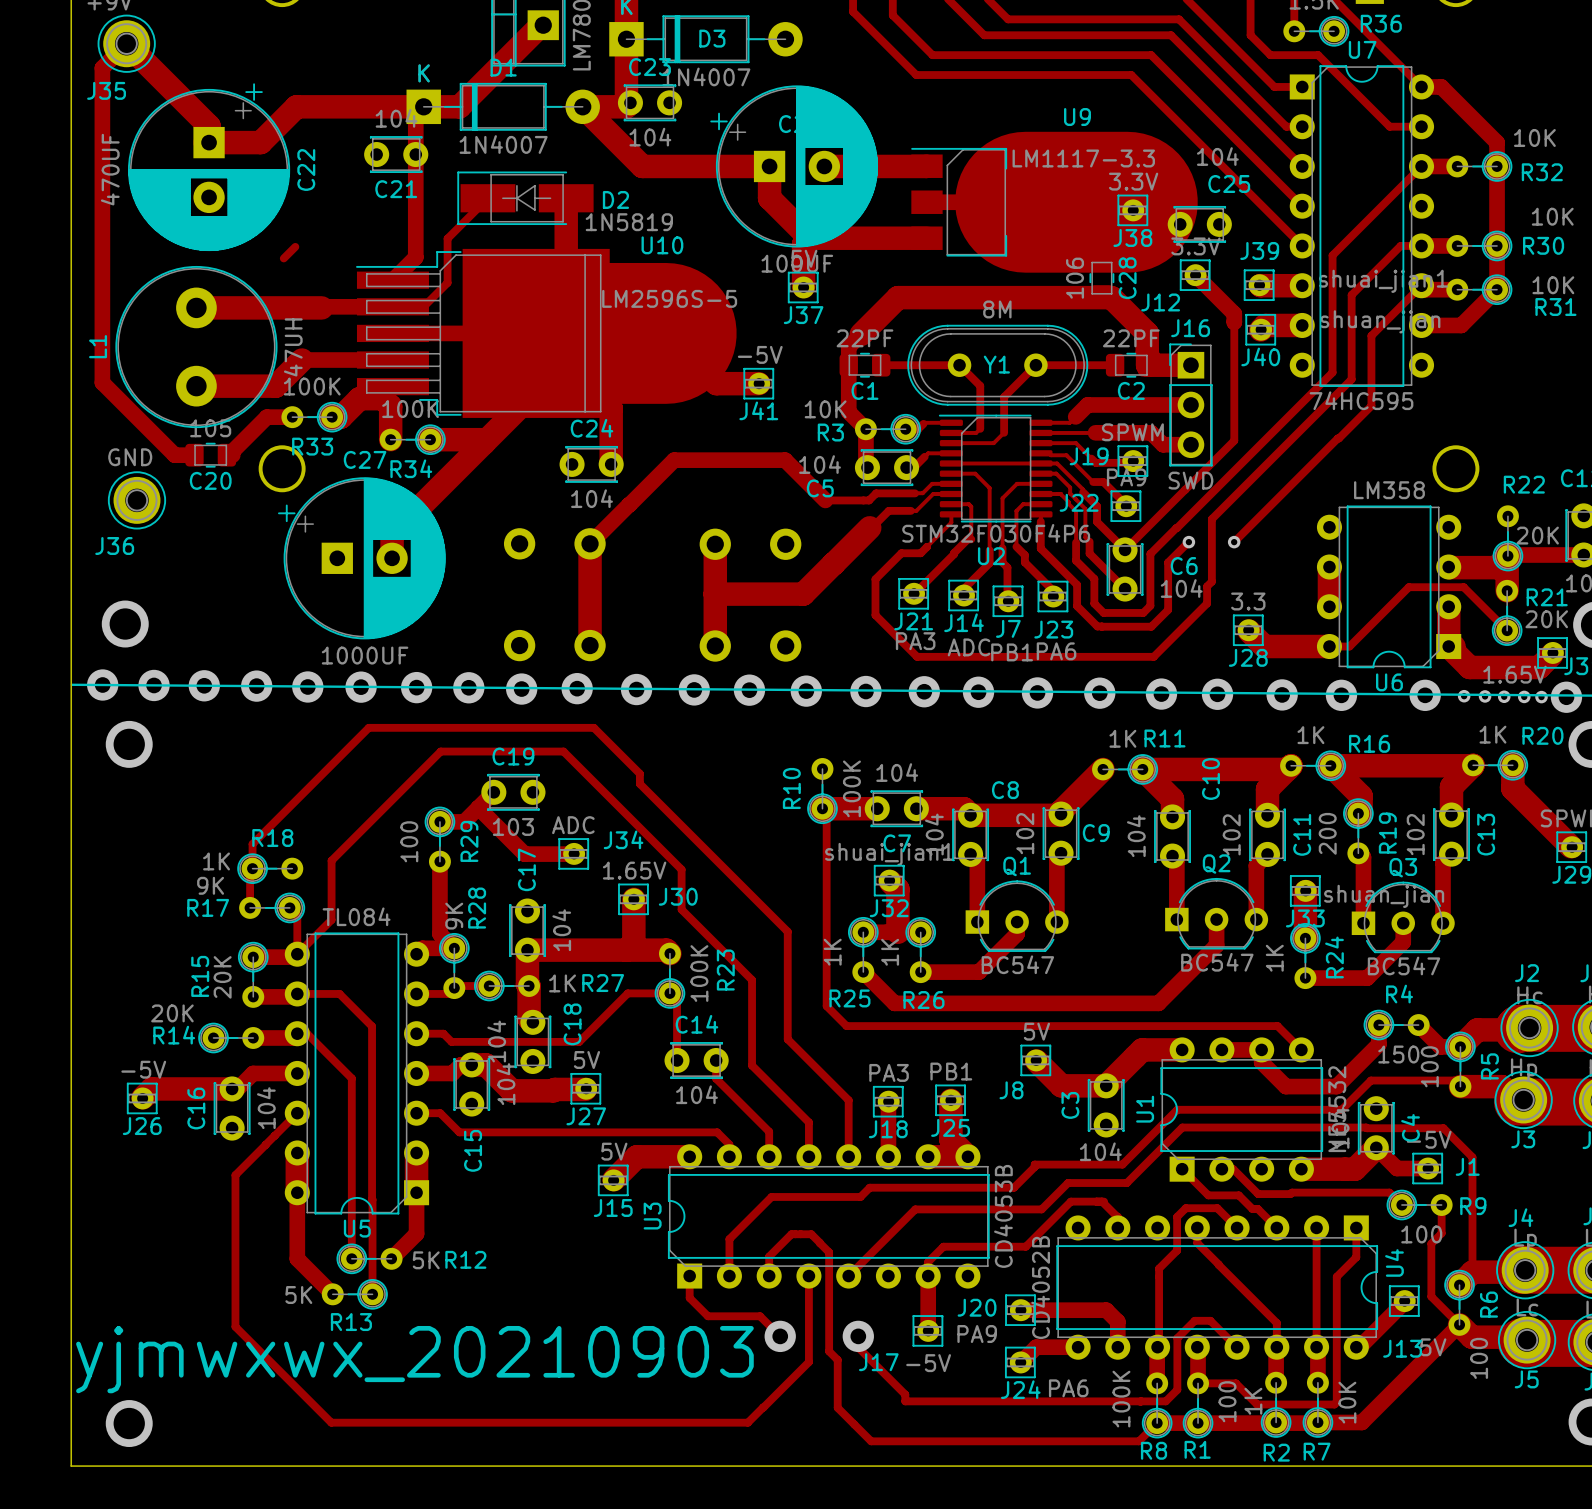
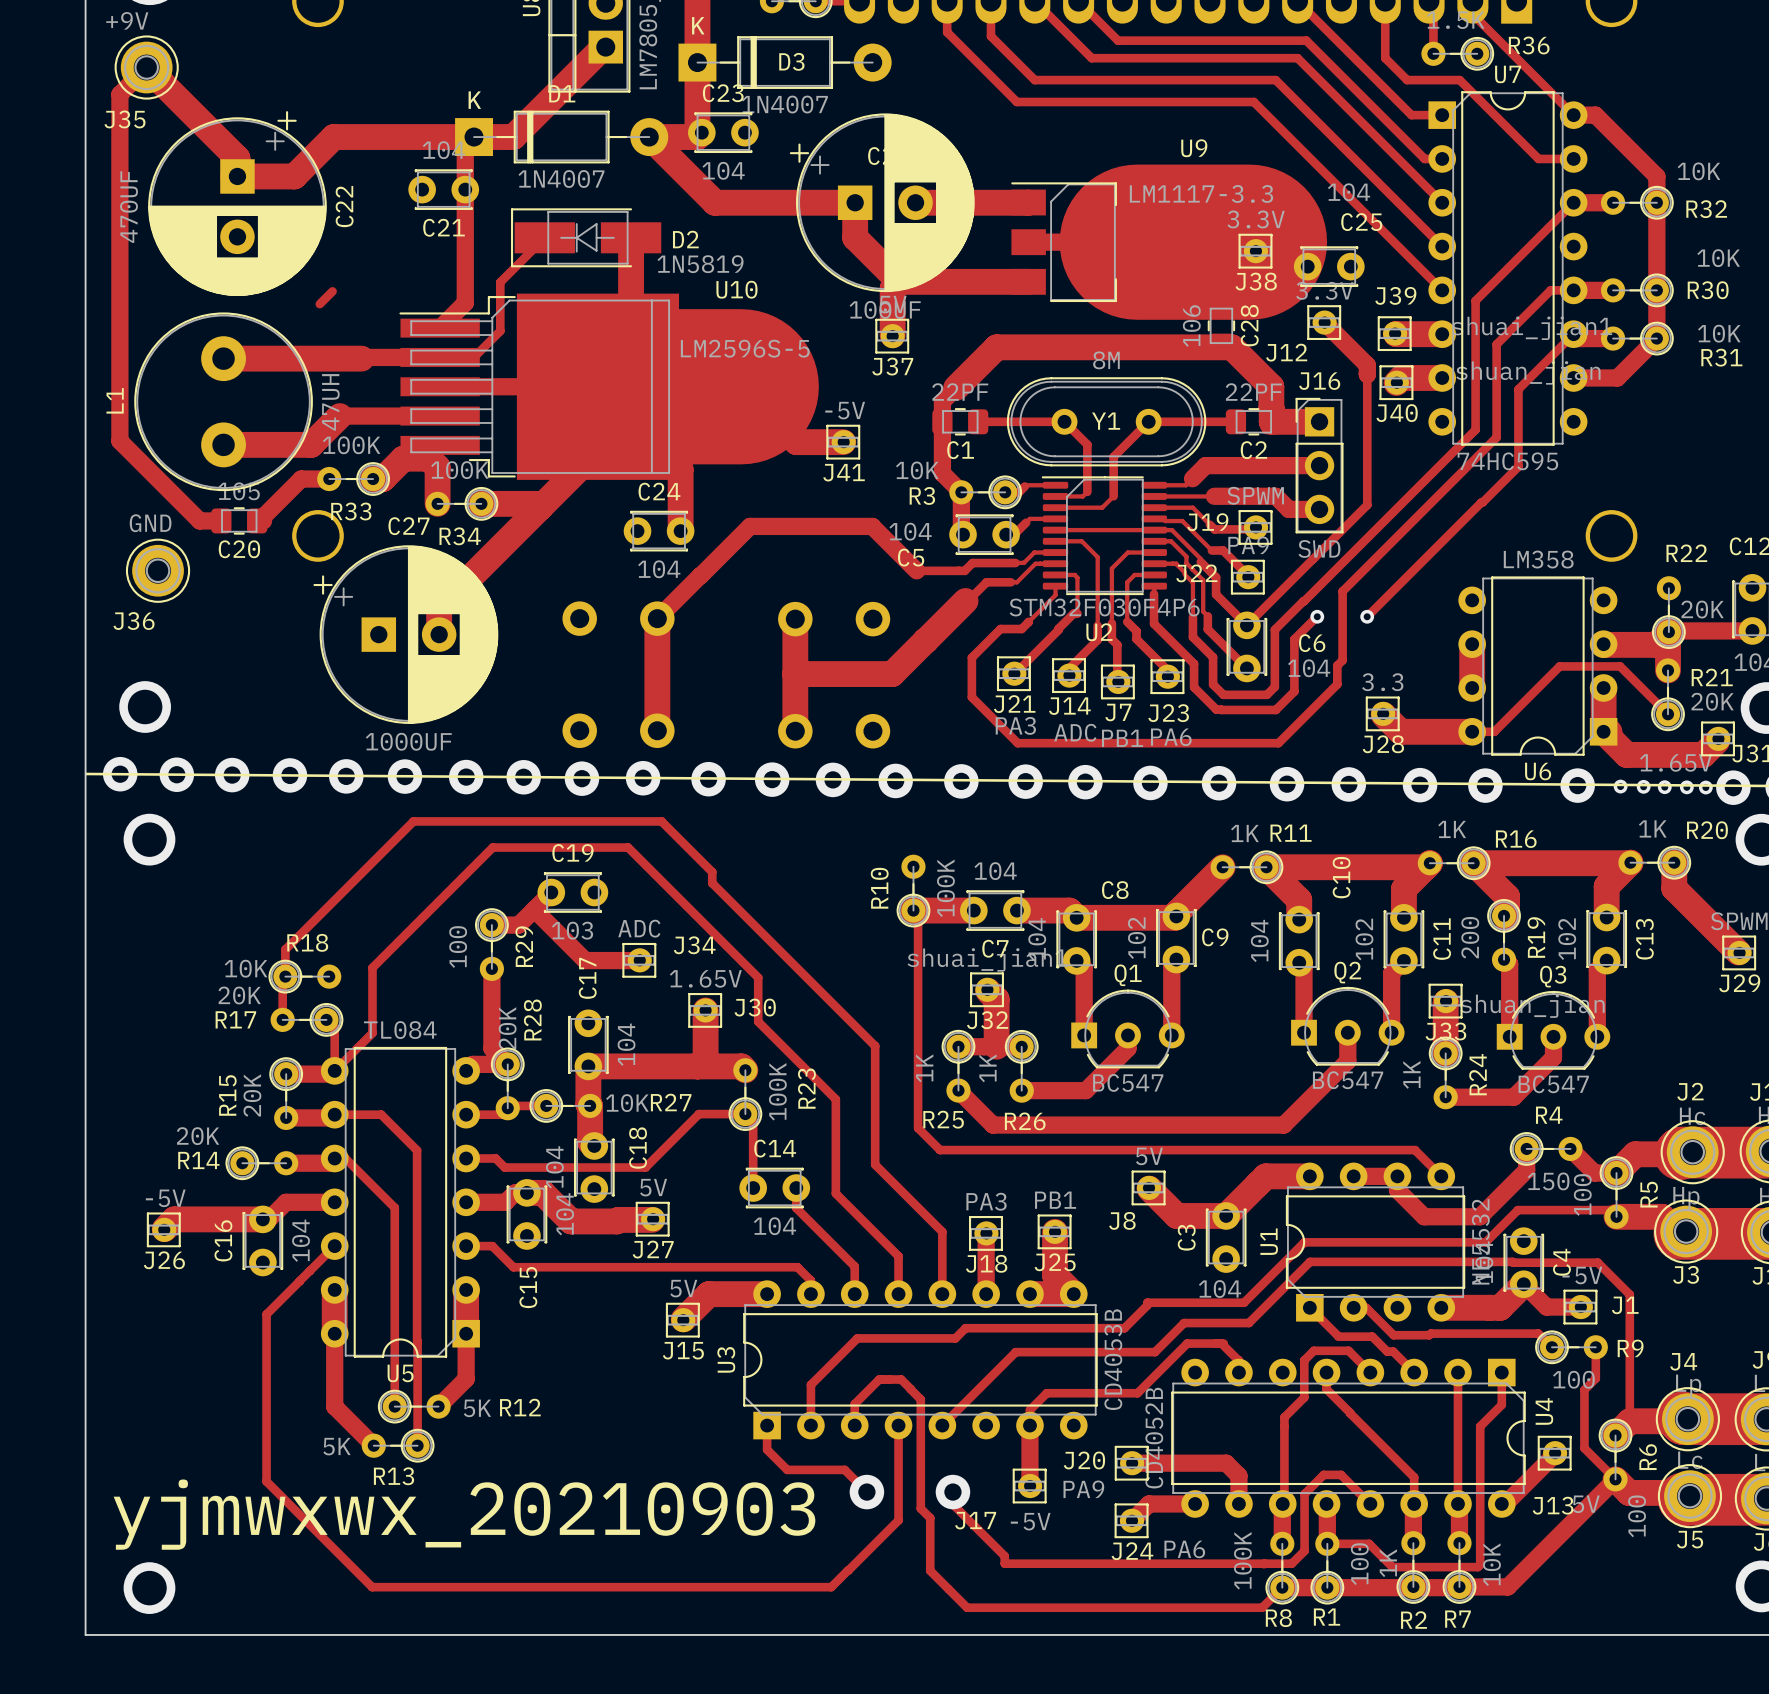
R18 value: 1K (216, 861) -> 10K (246, 968)
R17 value: 9K (210, 885) -> 20K (239, 995)
R28 value: 9K (454, 916) -> 20K (507, 1028)
R27 value: 1K (562, 983) -> 10K (627, 1103)

